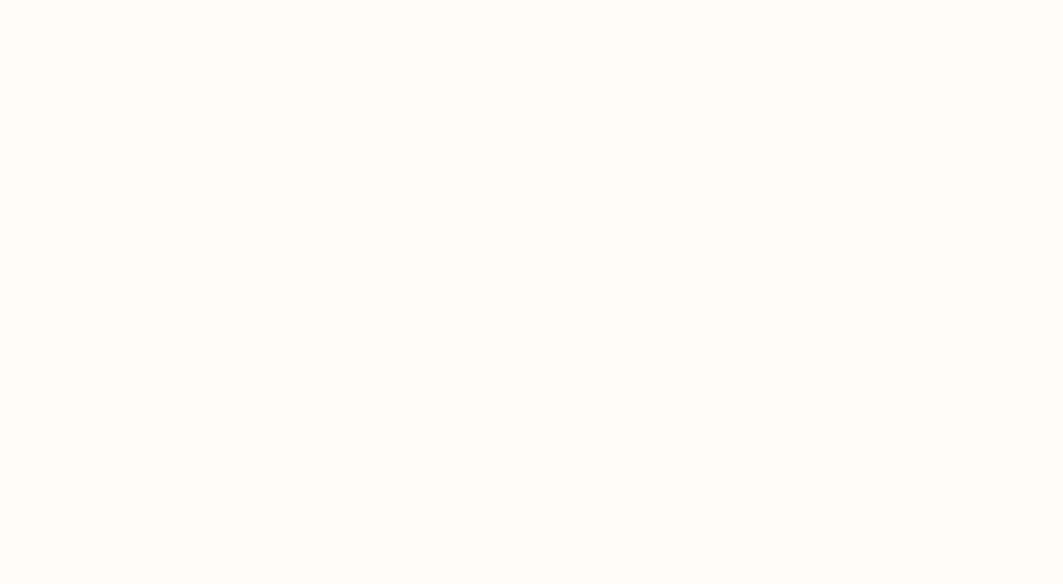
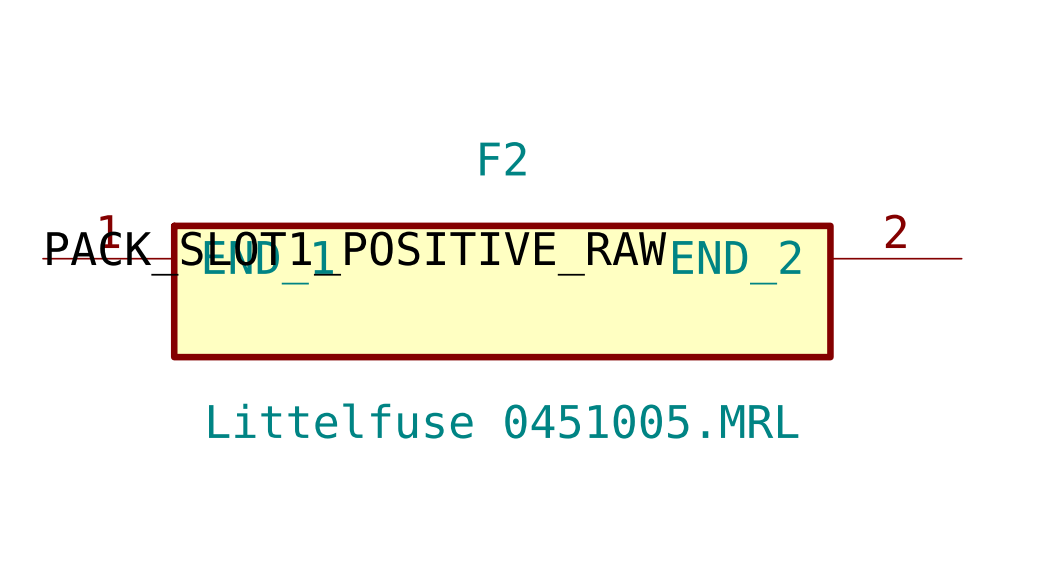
label: none -> PACK_SLOT1_POSITIVE_RAW (356, 253)
F2: none -> Littelfuse 0451005.MRL (502, 291)

